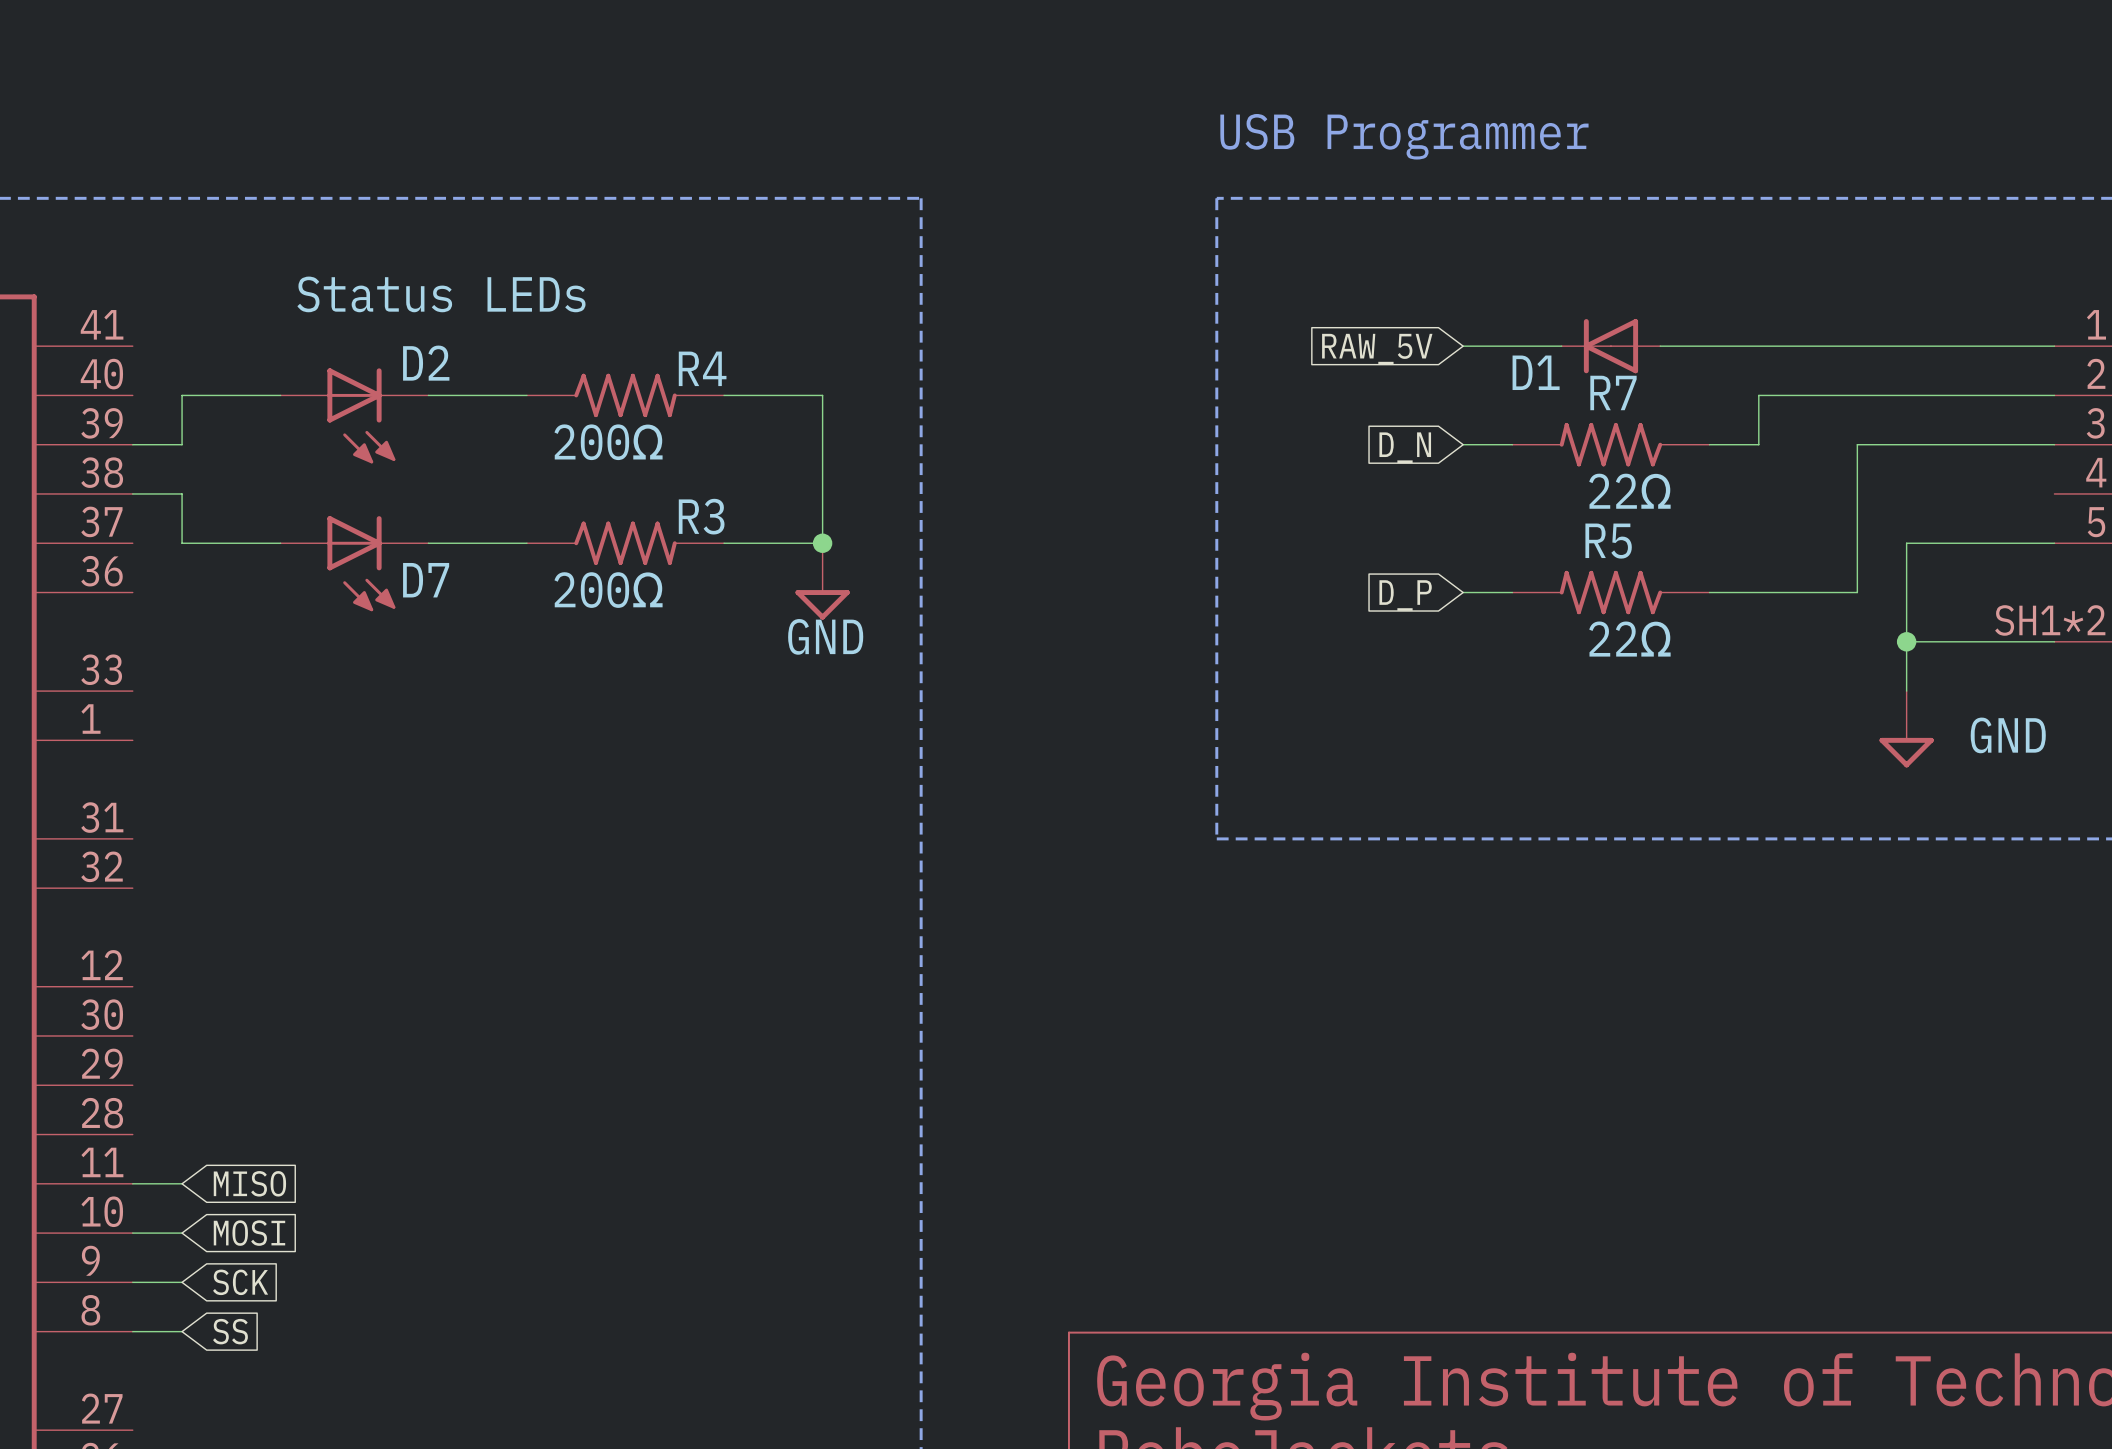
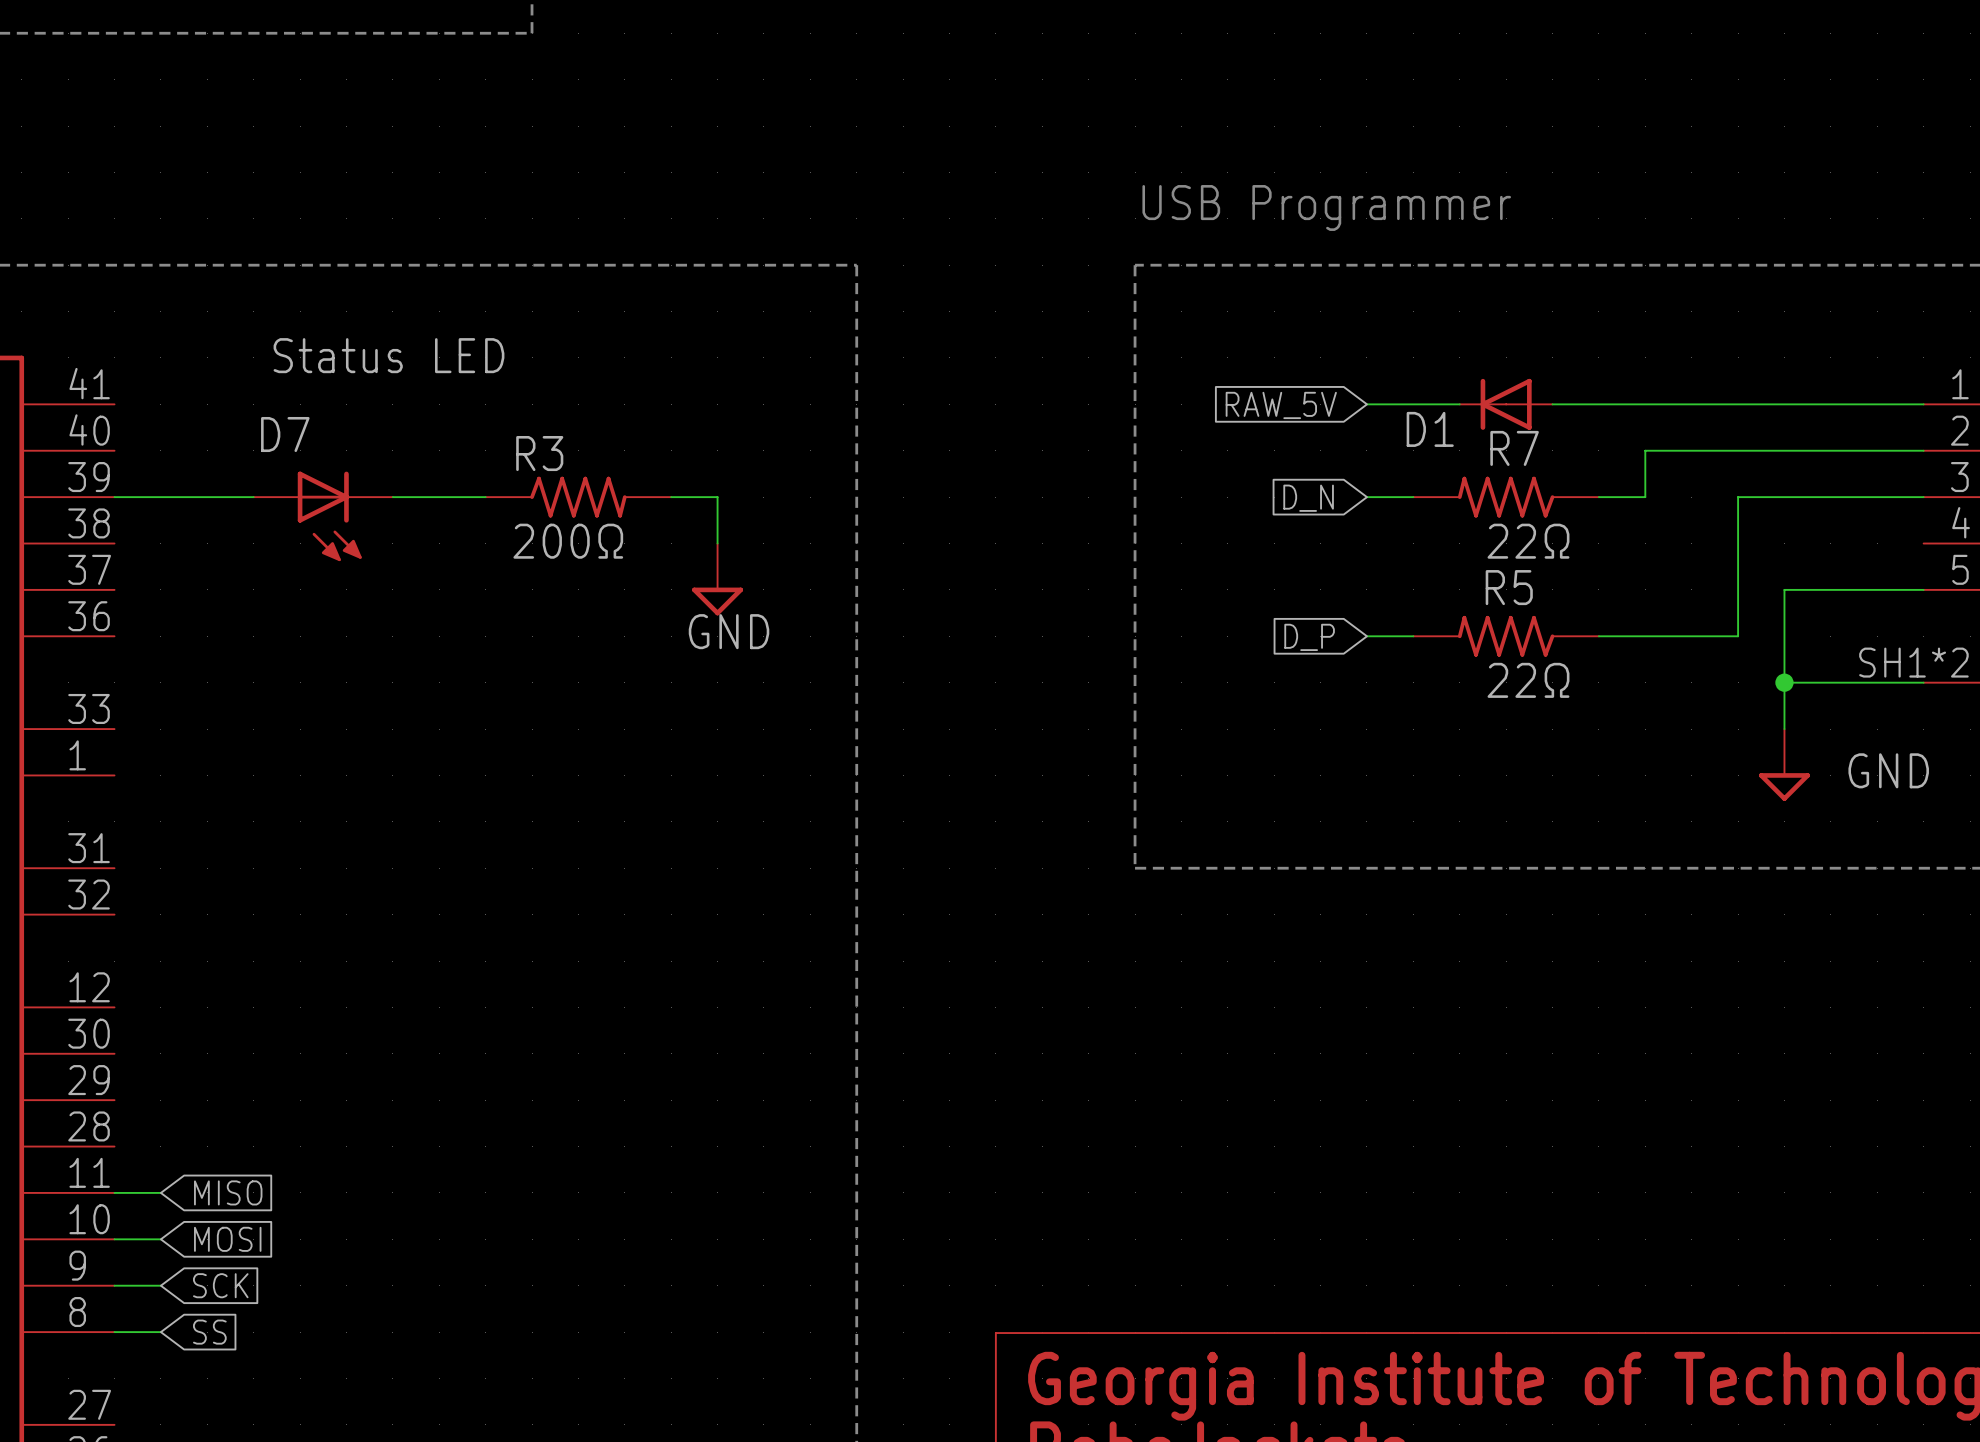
text: Status LEDs (441, 294) -> Status LED (388, 355)
wire: (280, 395) (182, 395) (182, 444) -> (253, 497) (160, 497)
wire: (428, 395) (526, 395) -> (392, 497) (485, 497)
R4: 200Ω (625, 395) -> none
wire: (724, 395) (822, 395) (822, 543) (724, 543) -> none
D2: (354, 415) -> none
wire: none -> (671, 497) (717, 497) (717, 543)
wire: (132, 493) (182, 493) (182, 543) (280, 543) -> none
R3 name position: R3 (701, 516) -> R3 (539, 453)
wire: (428, 543) (526, 543) -> none
R3 position: (625, 543) -> (578, 497)
junction: (822, 543) -> none
D7 position: (354, 563) -> (323, 516)
D7 name position: D7 (426, 580) -> D7 (285, 434)
power symbol position: GND (822, 581) -> GND (717, 579)

